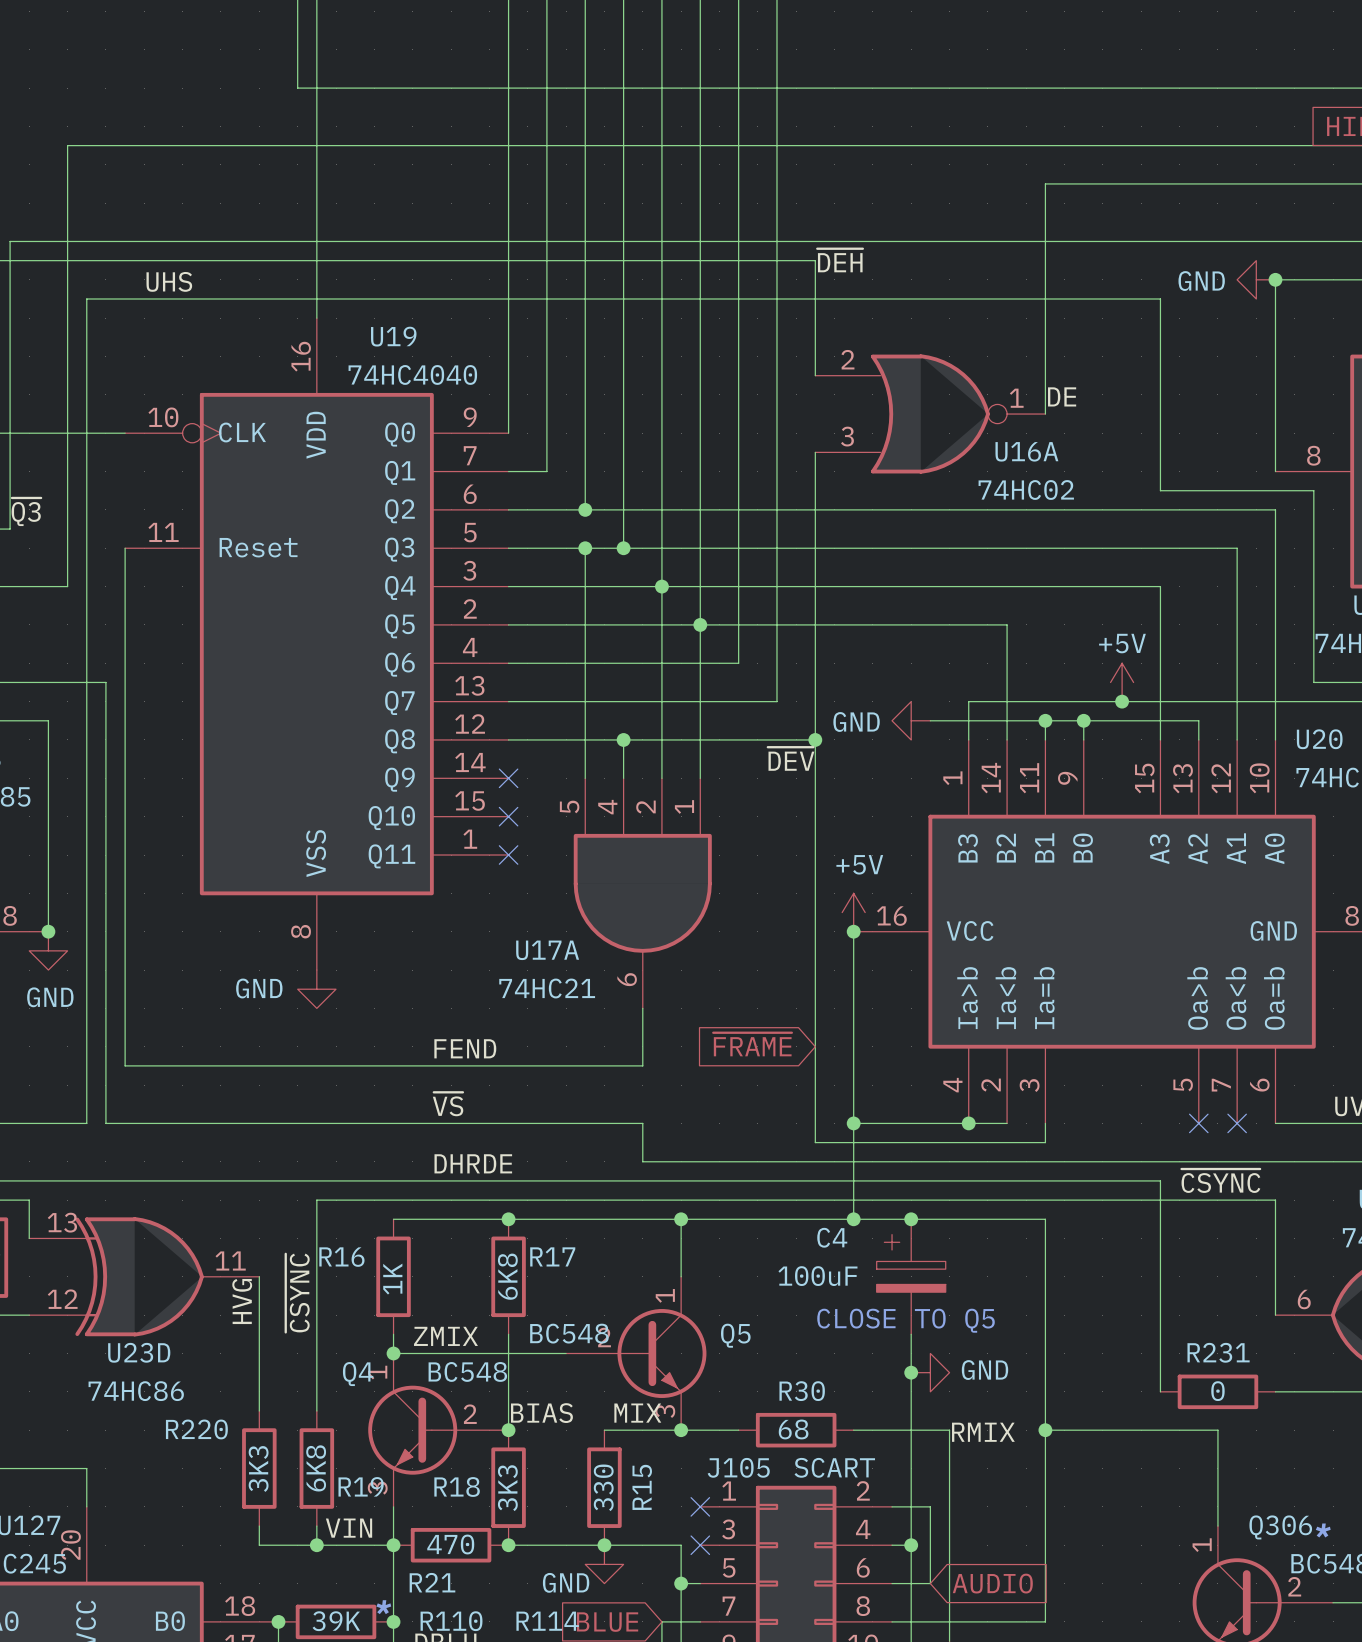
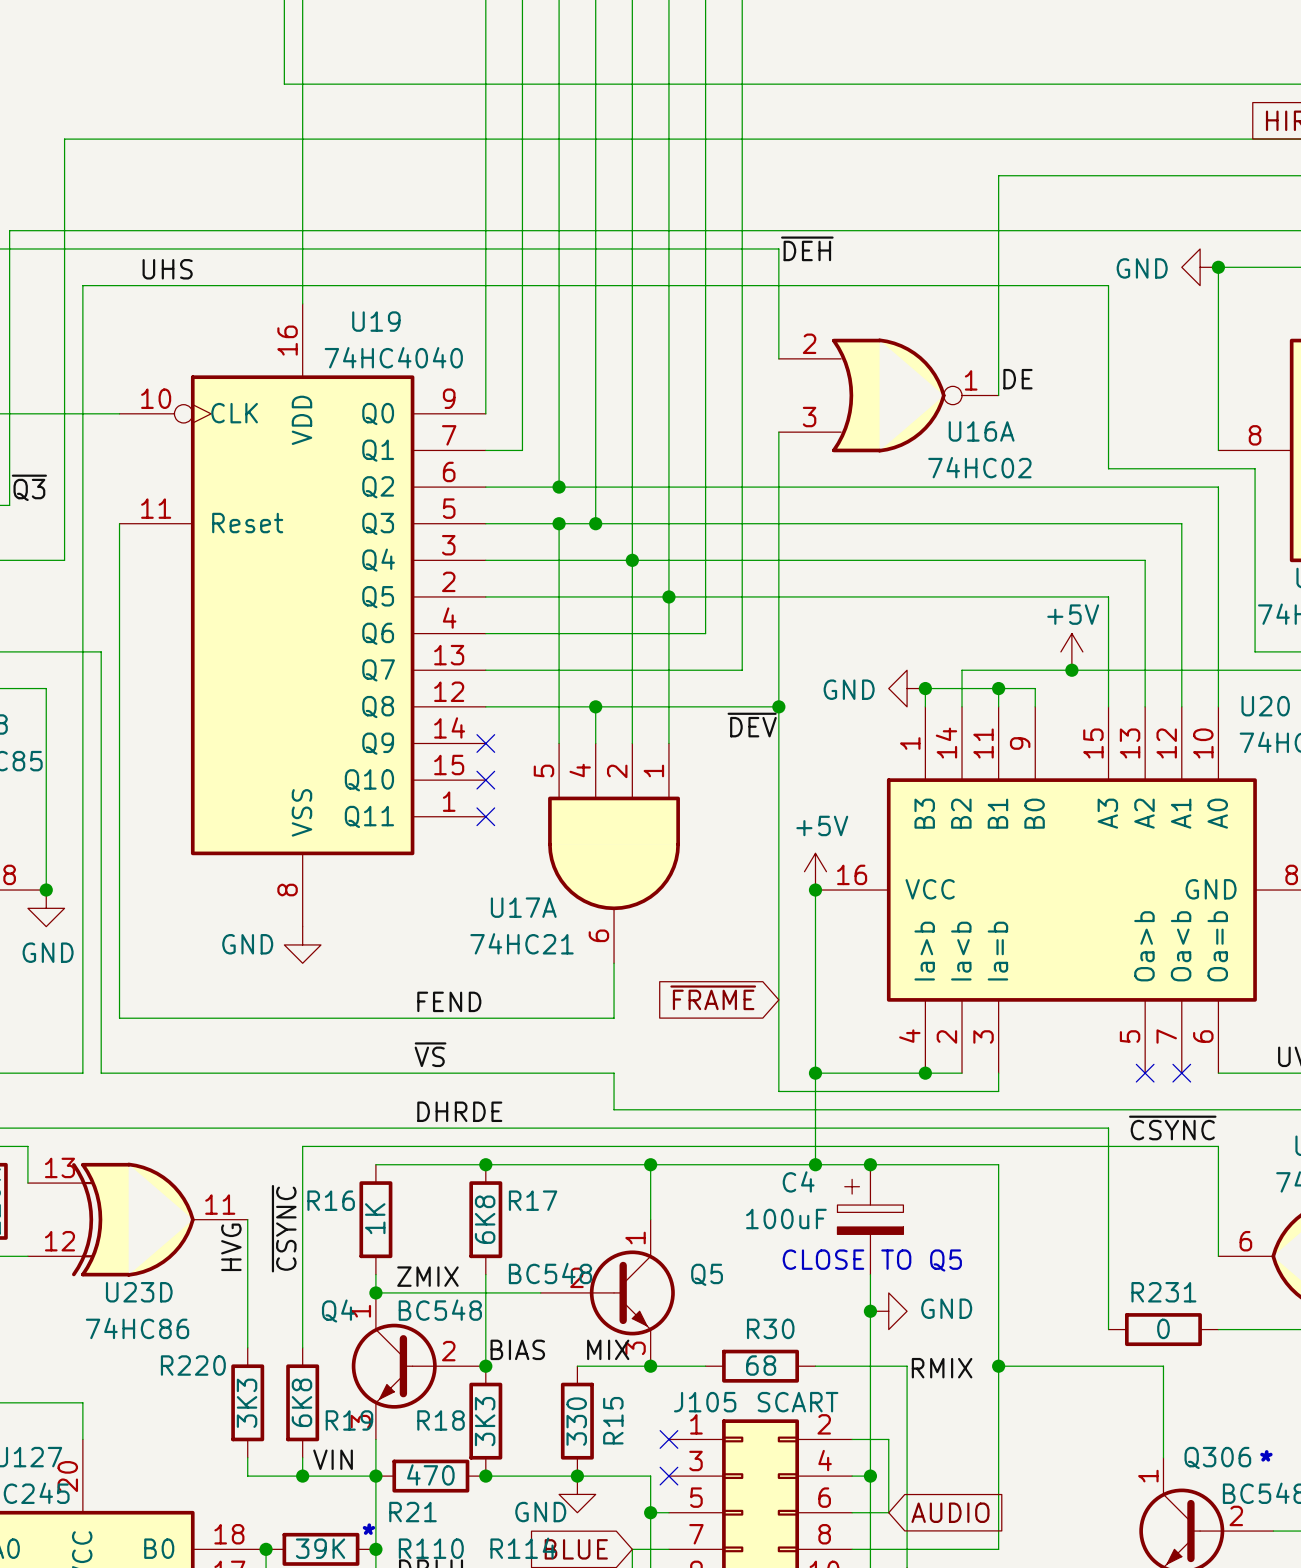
wire: (1160, 586) (1160, 624) -> (1108, 560) (1145, 560) (1145, 688)
wire: (1007, 624) (1007, 701) (968, 701) (968, 720) (930, 720) -> (962, 596) (1108, 596)
power symbol position: GND (911, 720) -> GND (907, 688)
junction: none -> (925, 688)
wire: (1083, 720) (1198, 720) -> none
junction: (1083, 720) -> none

